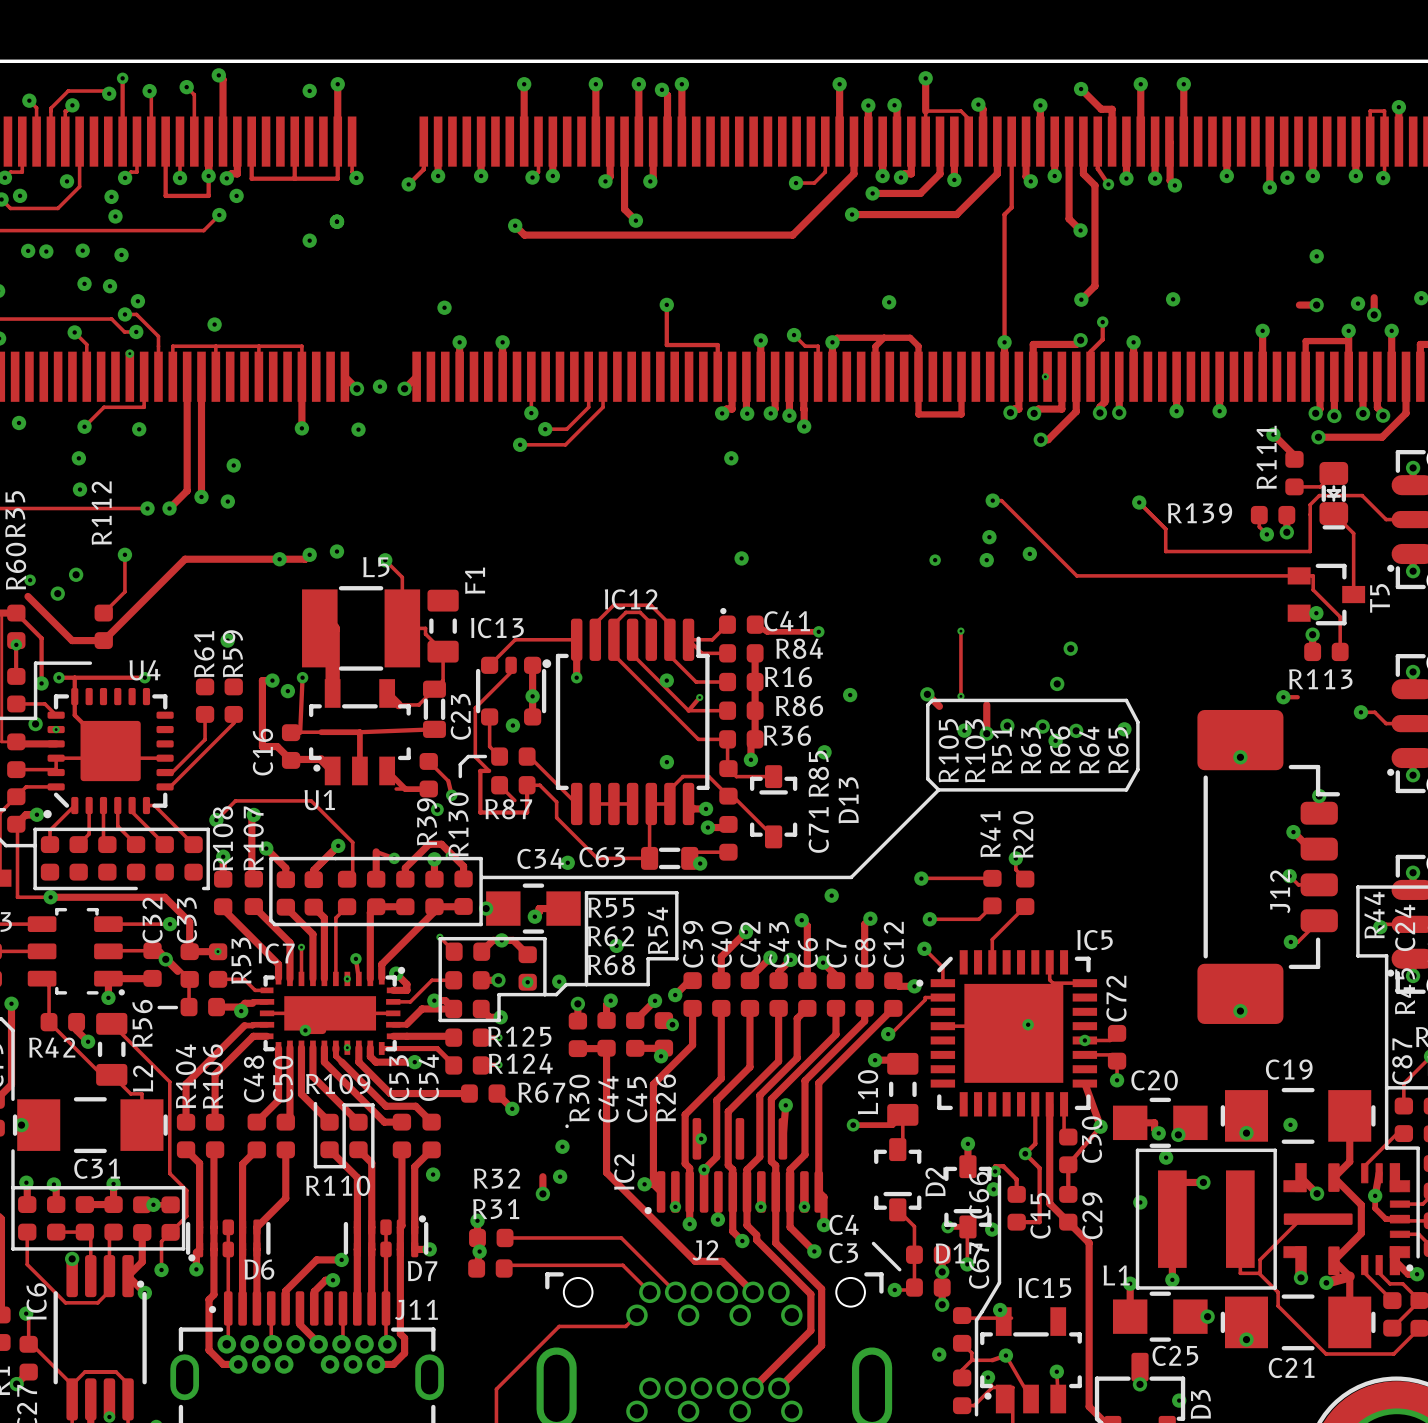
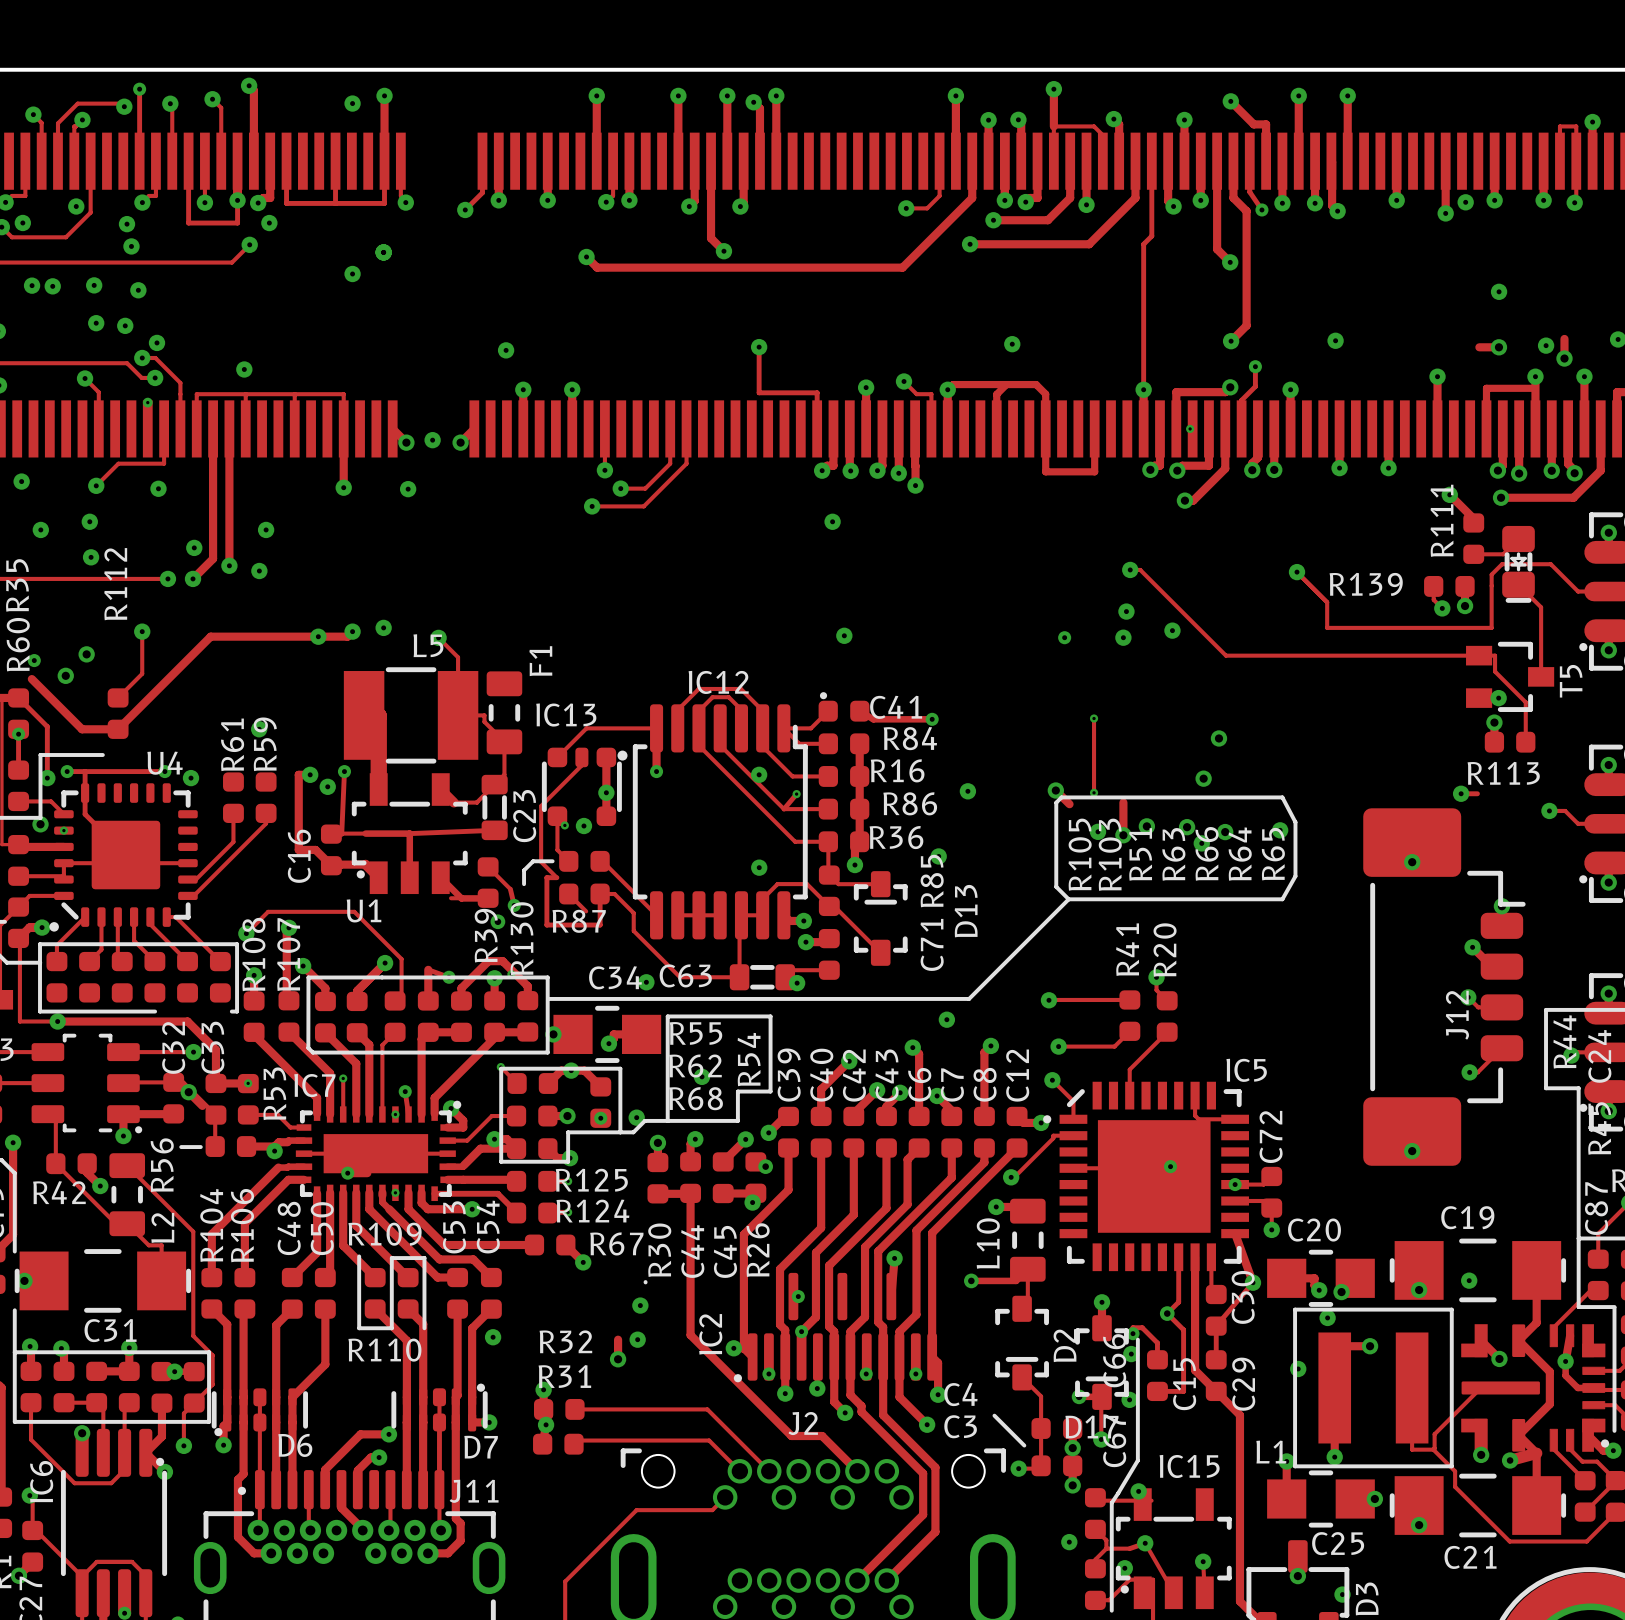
via: none -> (40, 529)
via: none -> (194, 547)
via: none -> (191, 778)
via: none -> (564, 825)

